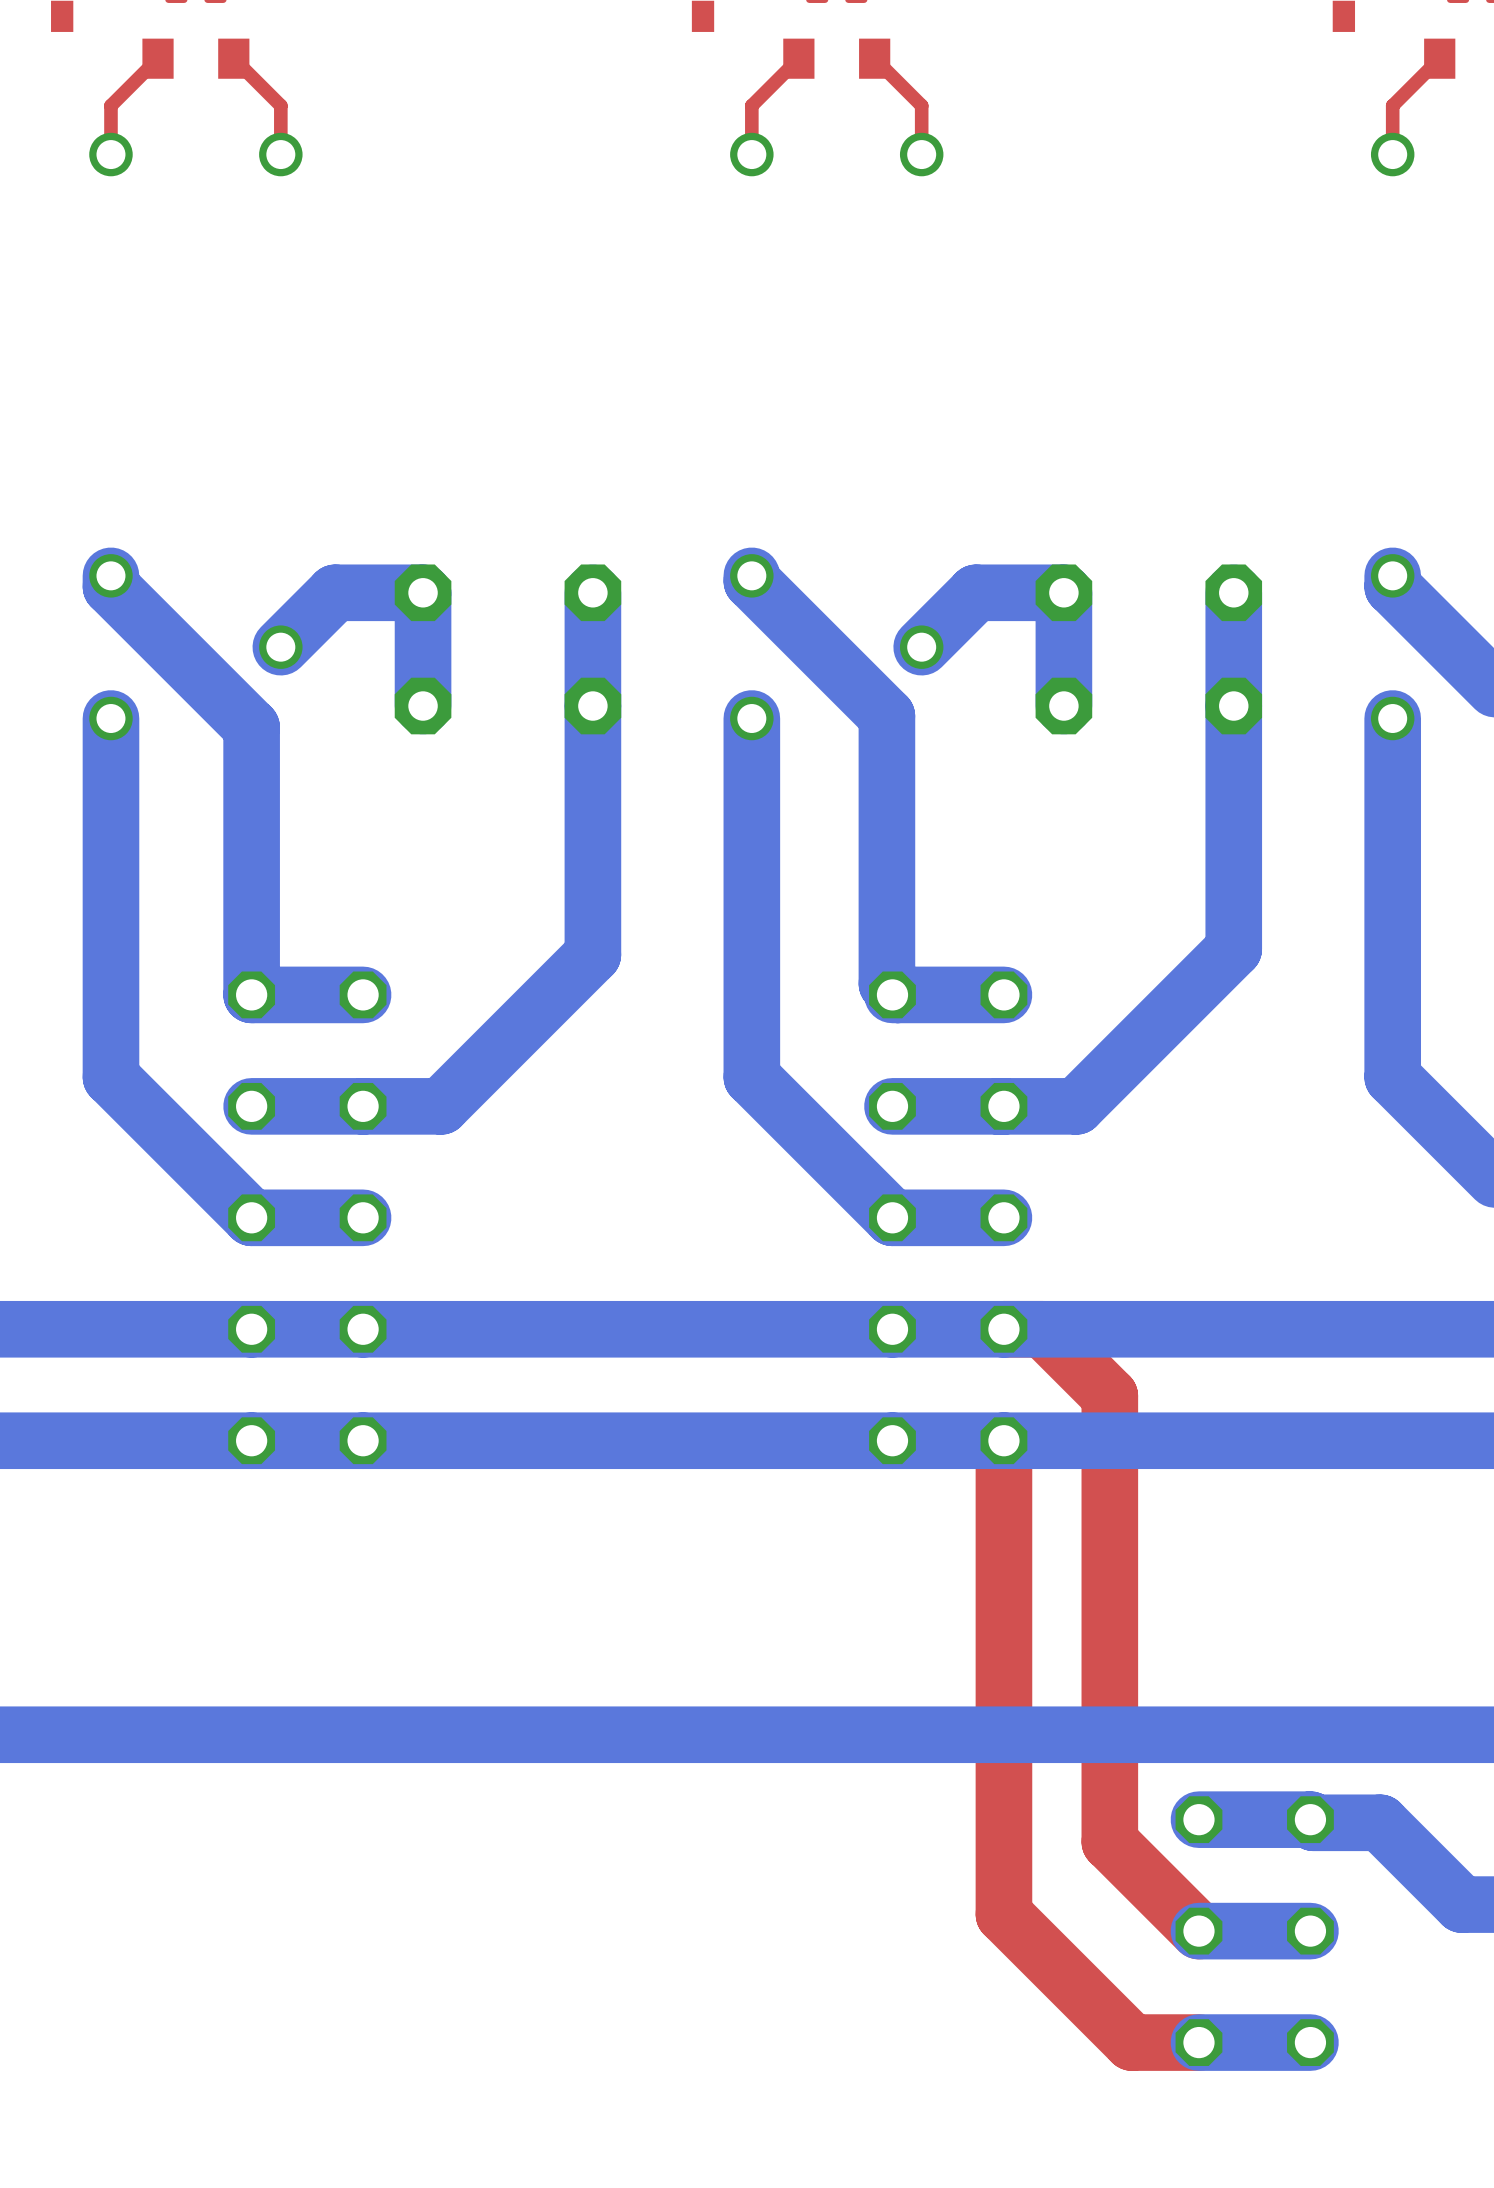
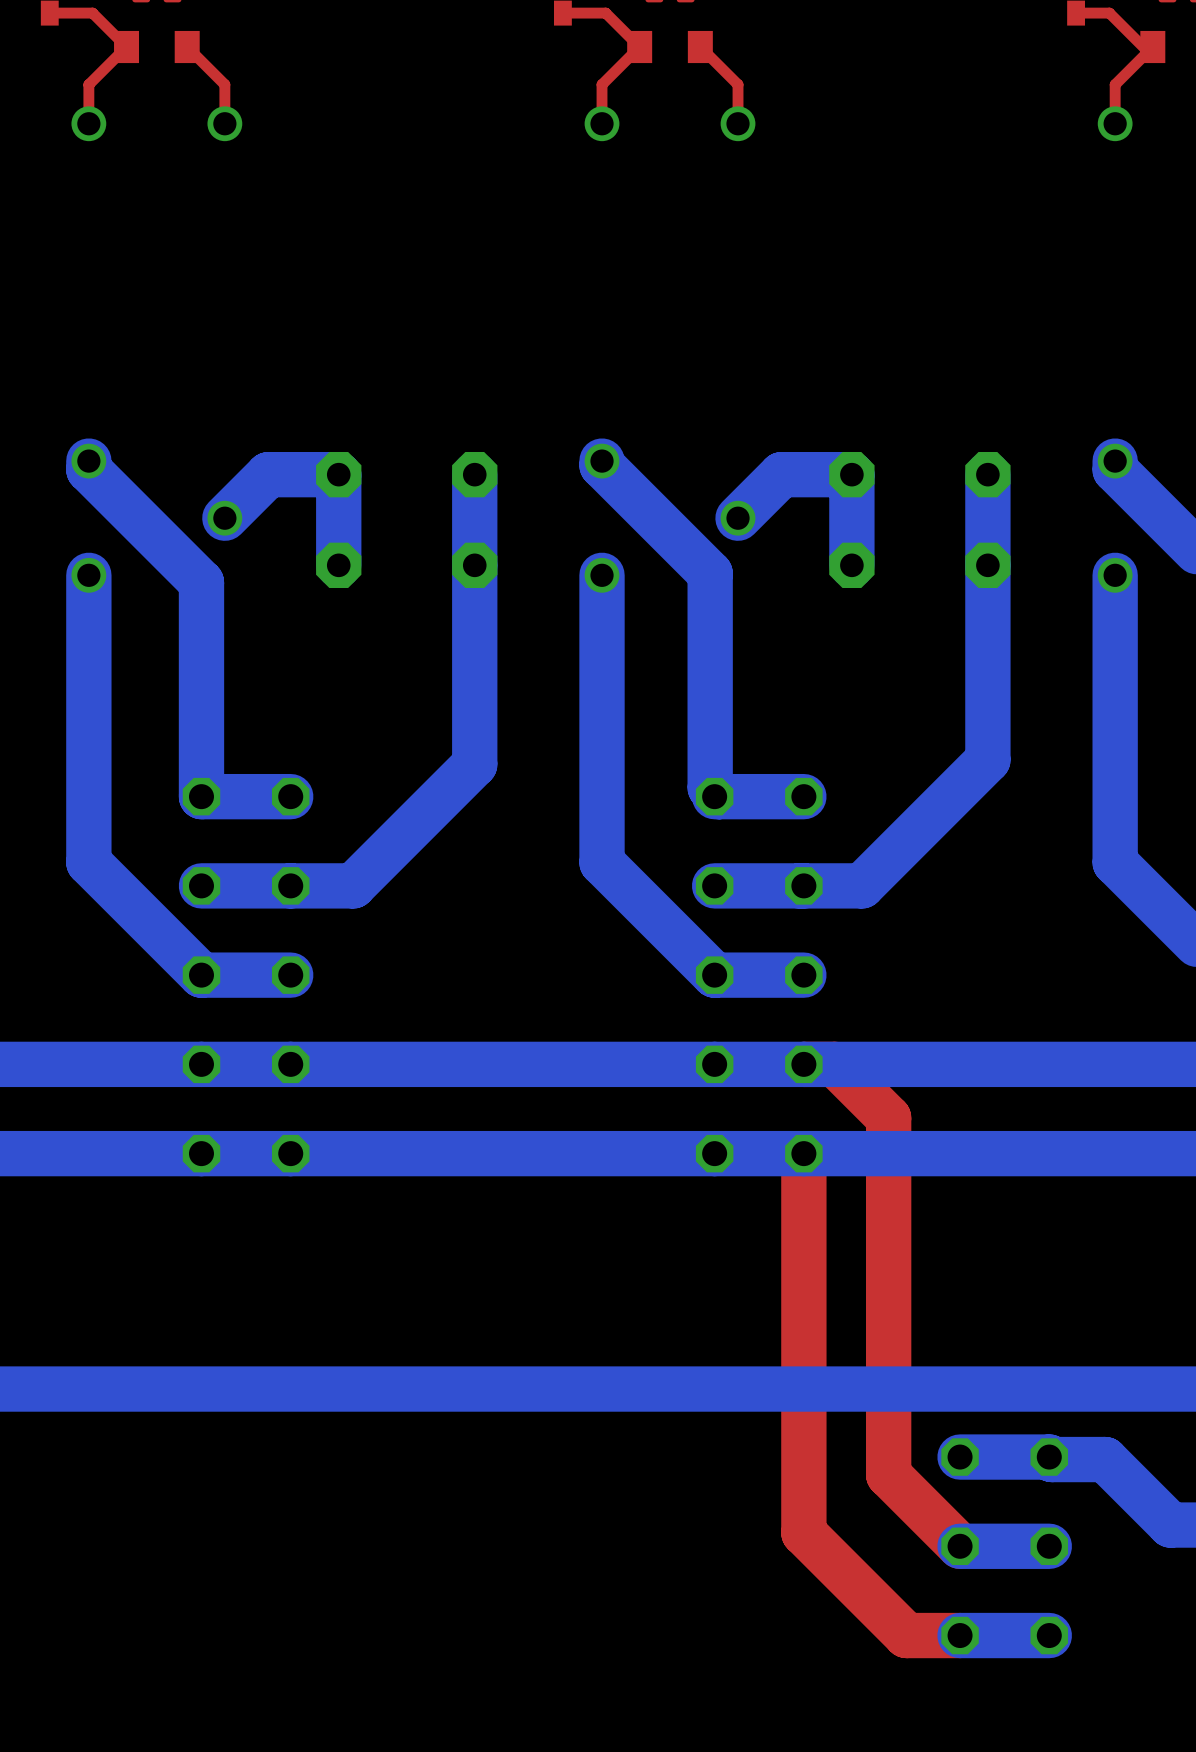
top track: none -> (49, 13) (92, 13) (126, 47)
top track: none -> (562, 13) (605, 13) (639, 47)
top track: none -> (1076, 13) (1109, 13) (1148, 51)

